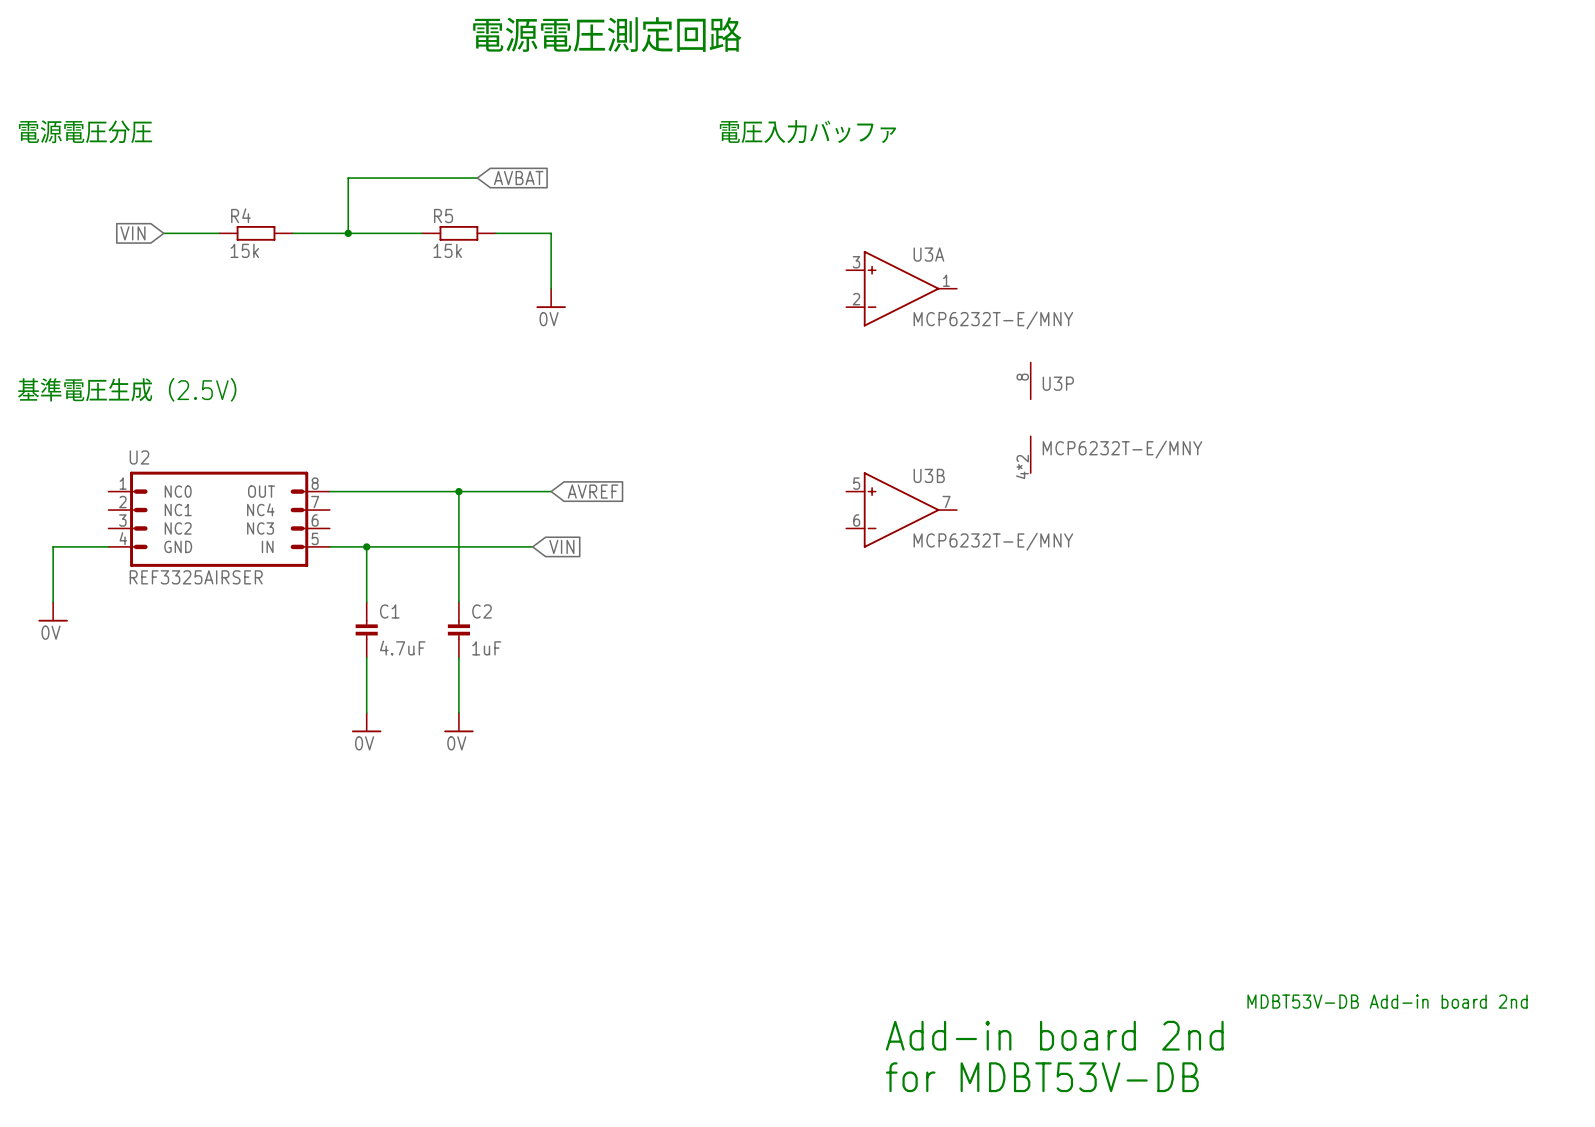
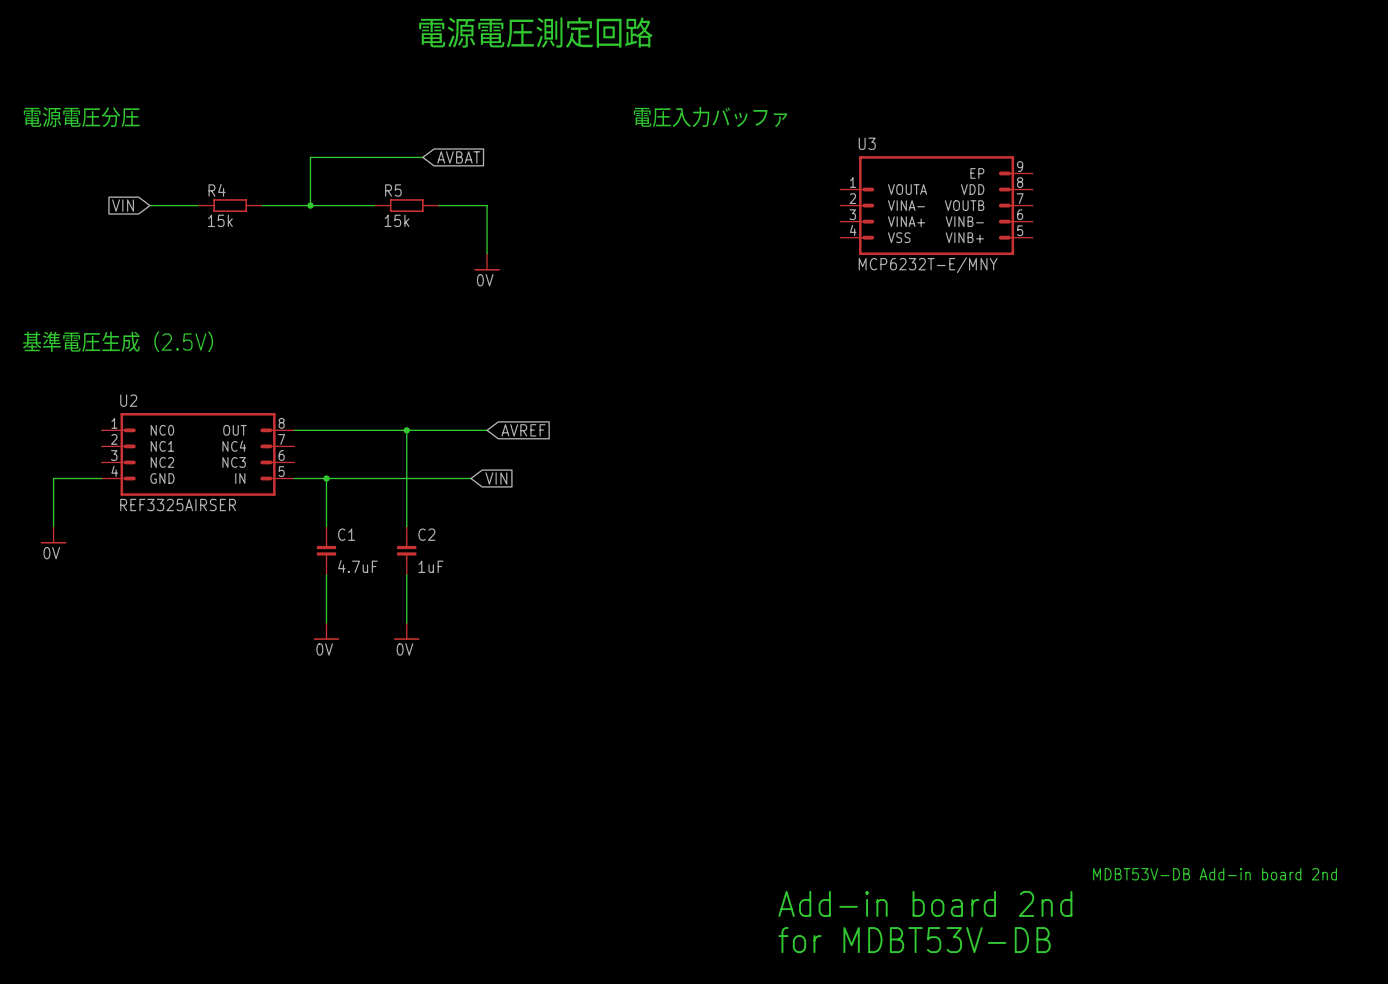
U3: none -> MCP6232T-E/MNY (936, 205)
U3A: MCP6232T-E/MNY (901, 288) -> none
U3P: MCP6232T-E/MNY (1030, 417) -> none
U3B: MCP6232T-E/MNY (901, 510) -> none

